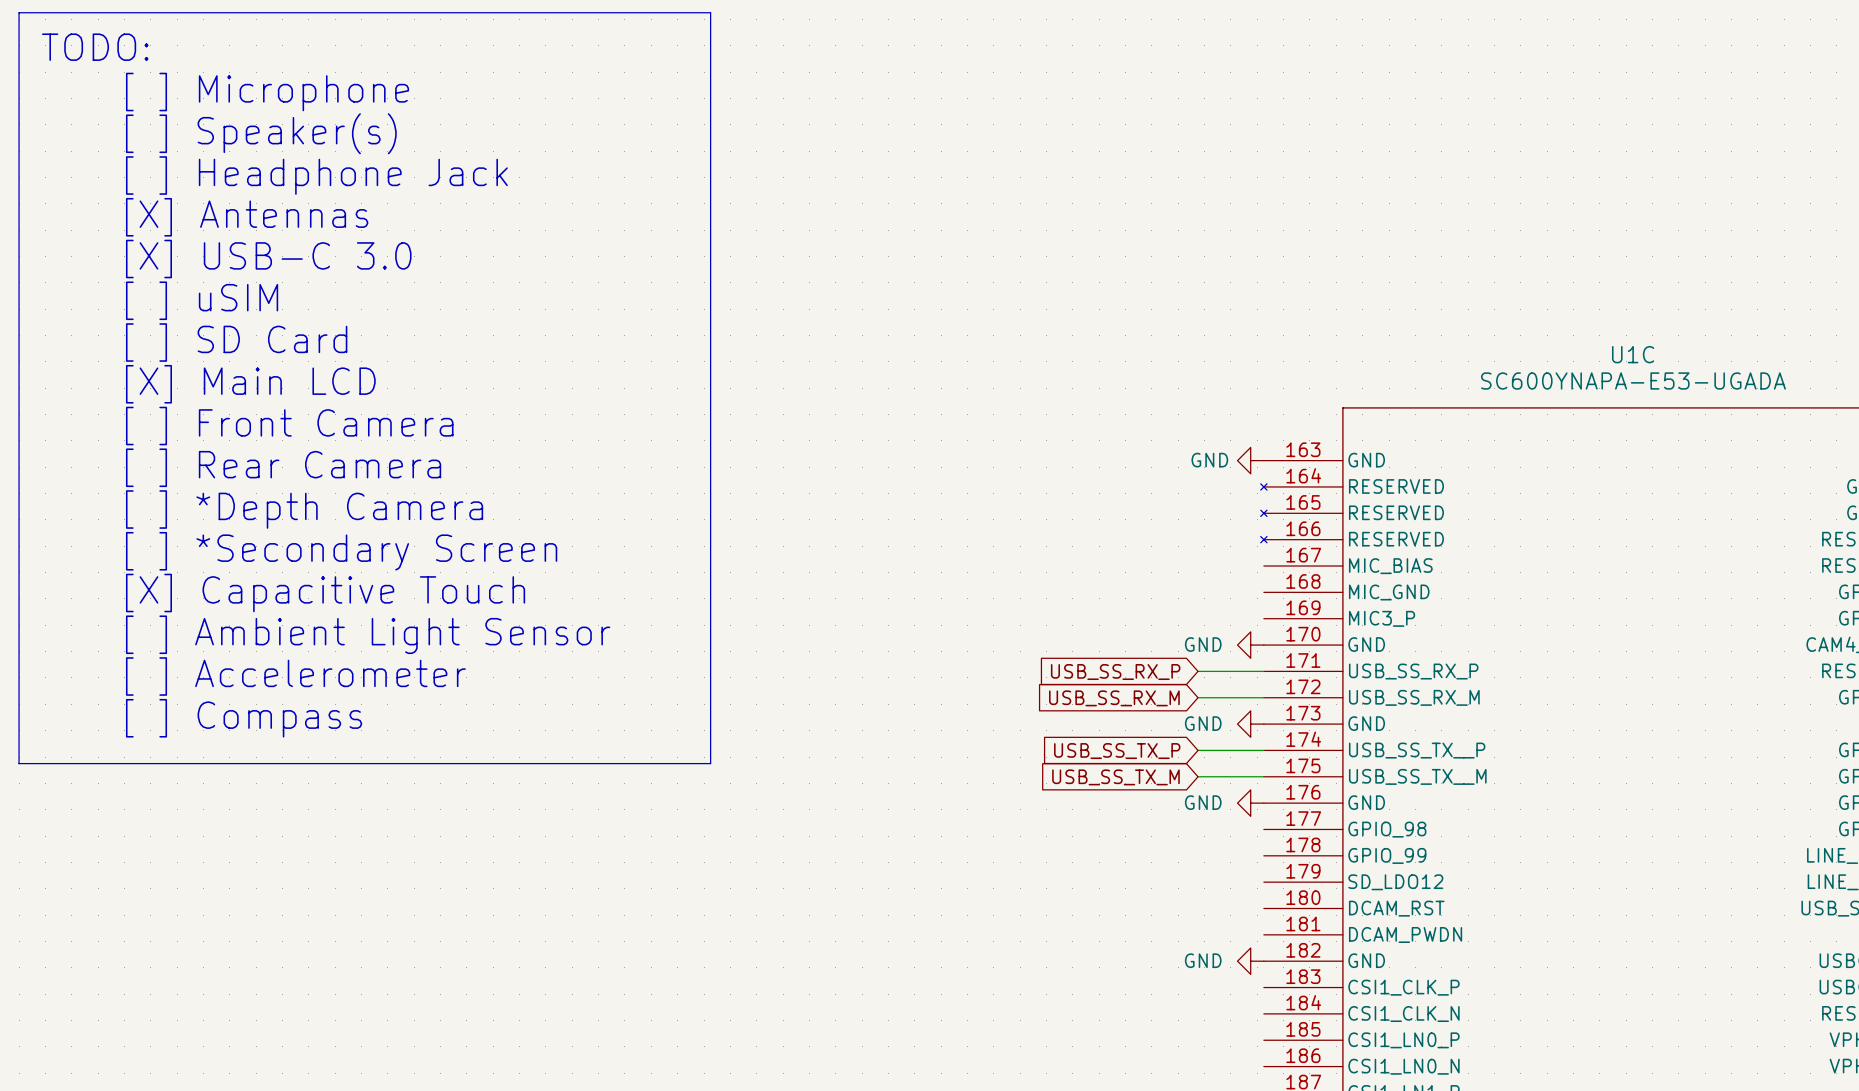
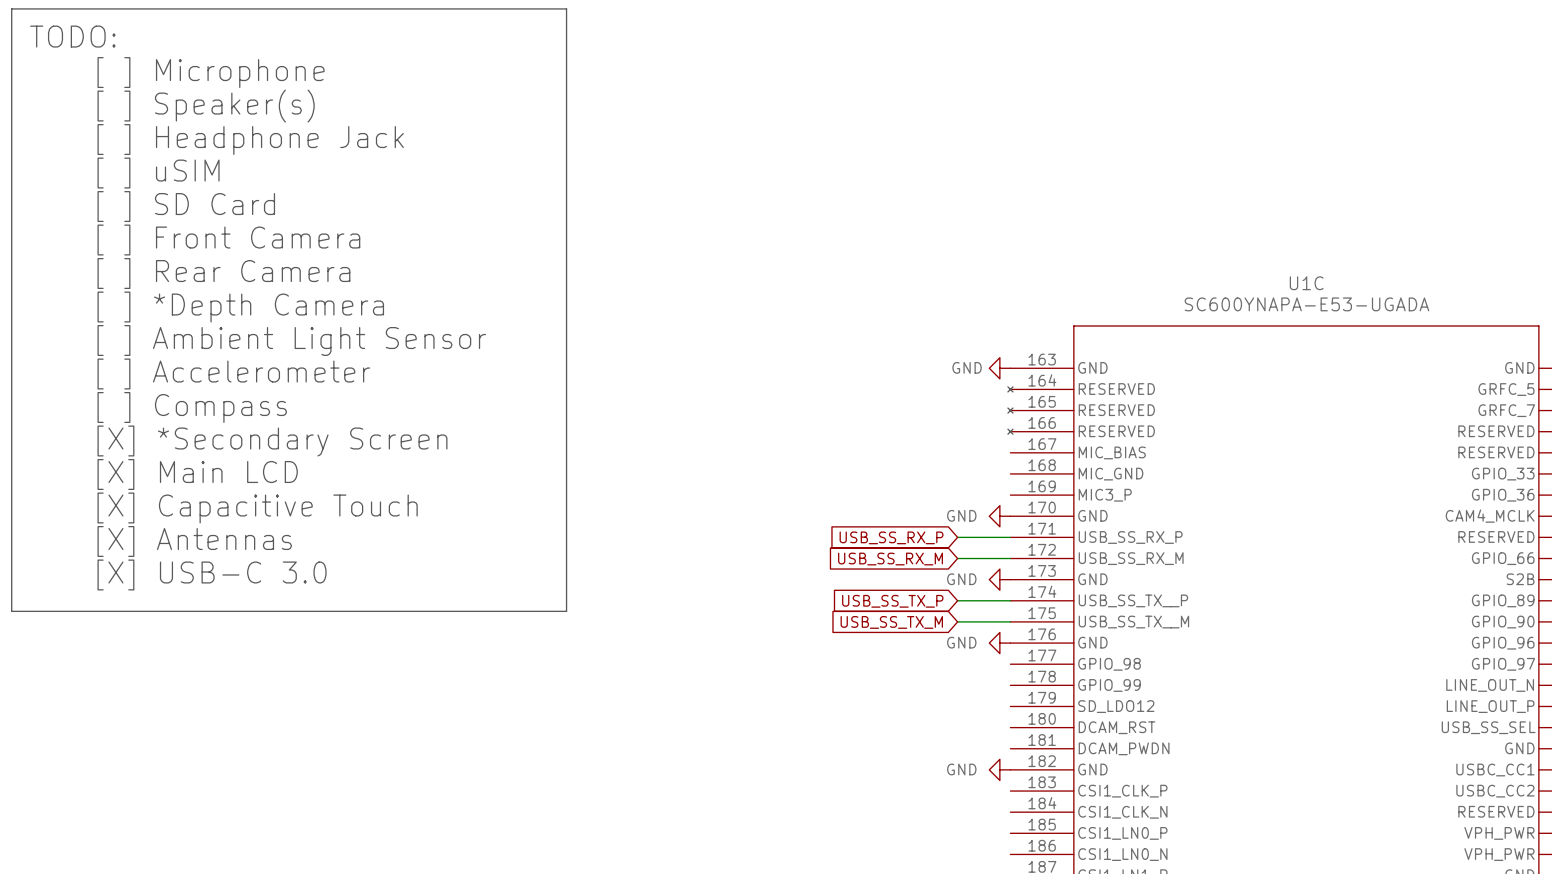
text: [X] Antennas (247, 217) -> [ ] uSIM (158, 173)
text: [X] USB-C 3.0 (268, 259) -> [ ] SD Card (186, 206)
text: [ ] uSIM (202, 300) -> [ ] Front Camera (228, 240)
text: [ ] SD Card (236, 342) -> [ ] Rear Camera (223, 273)
text: [X] Main LCD (250, 384) -> [ ] *Depth Camera (240, 307)
text: [ ] Front Camera (289, 426) -> [ ] Ambient Light Sensor (291, 340)
text: [ ] Rear Camera (283, 467) -> [ ] Accelerometer (233, 374)
text: [ ] *Depth Camera (304, 509) -> [ ] Compass (192, 407)
text: [ ] *Secondary Screen (341, 551) -> [X] *Secondary Screen (272, 440)
text: [X] Capacitive Touch (325, 593) -> [X] Main LCD (197, 474)
text: [ ] Ambient Light Sensor (368, 634) -> [X] Capacitive Touch (257, 507)
text: [ ] Accelerometer (295, 676) -> [X] Antennas (194, 541)
text: [ ] Compass (244, 718) -> [X] USB-C 3.0 (212, 574)

